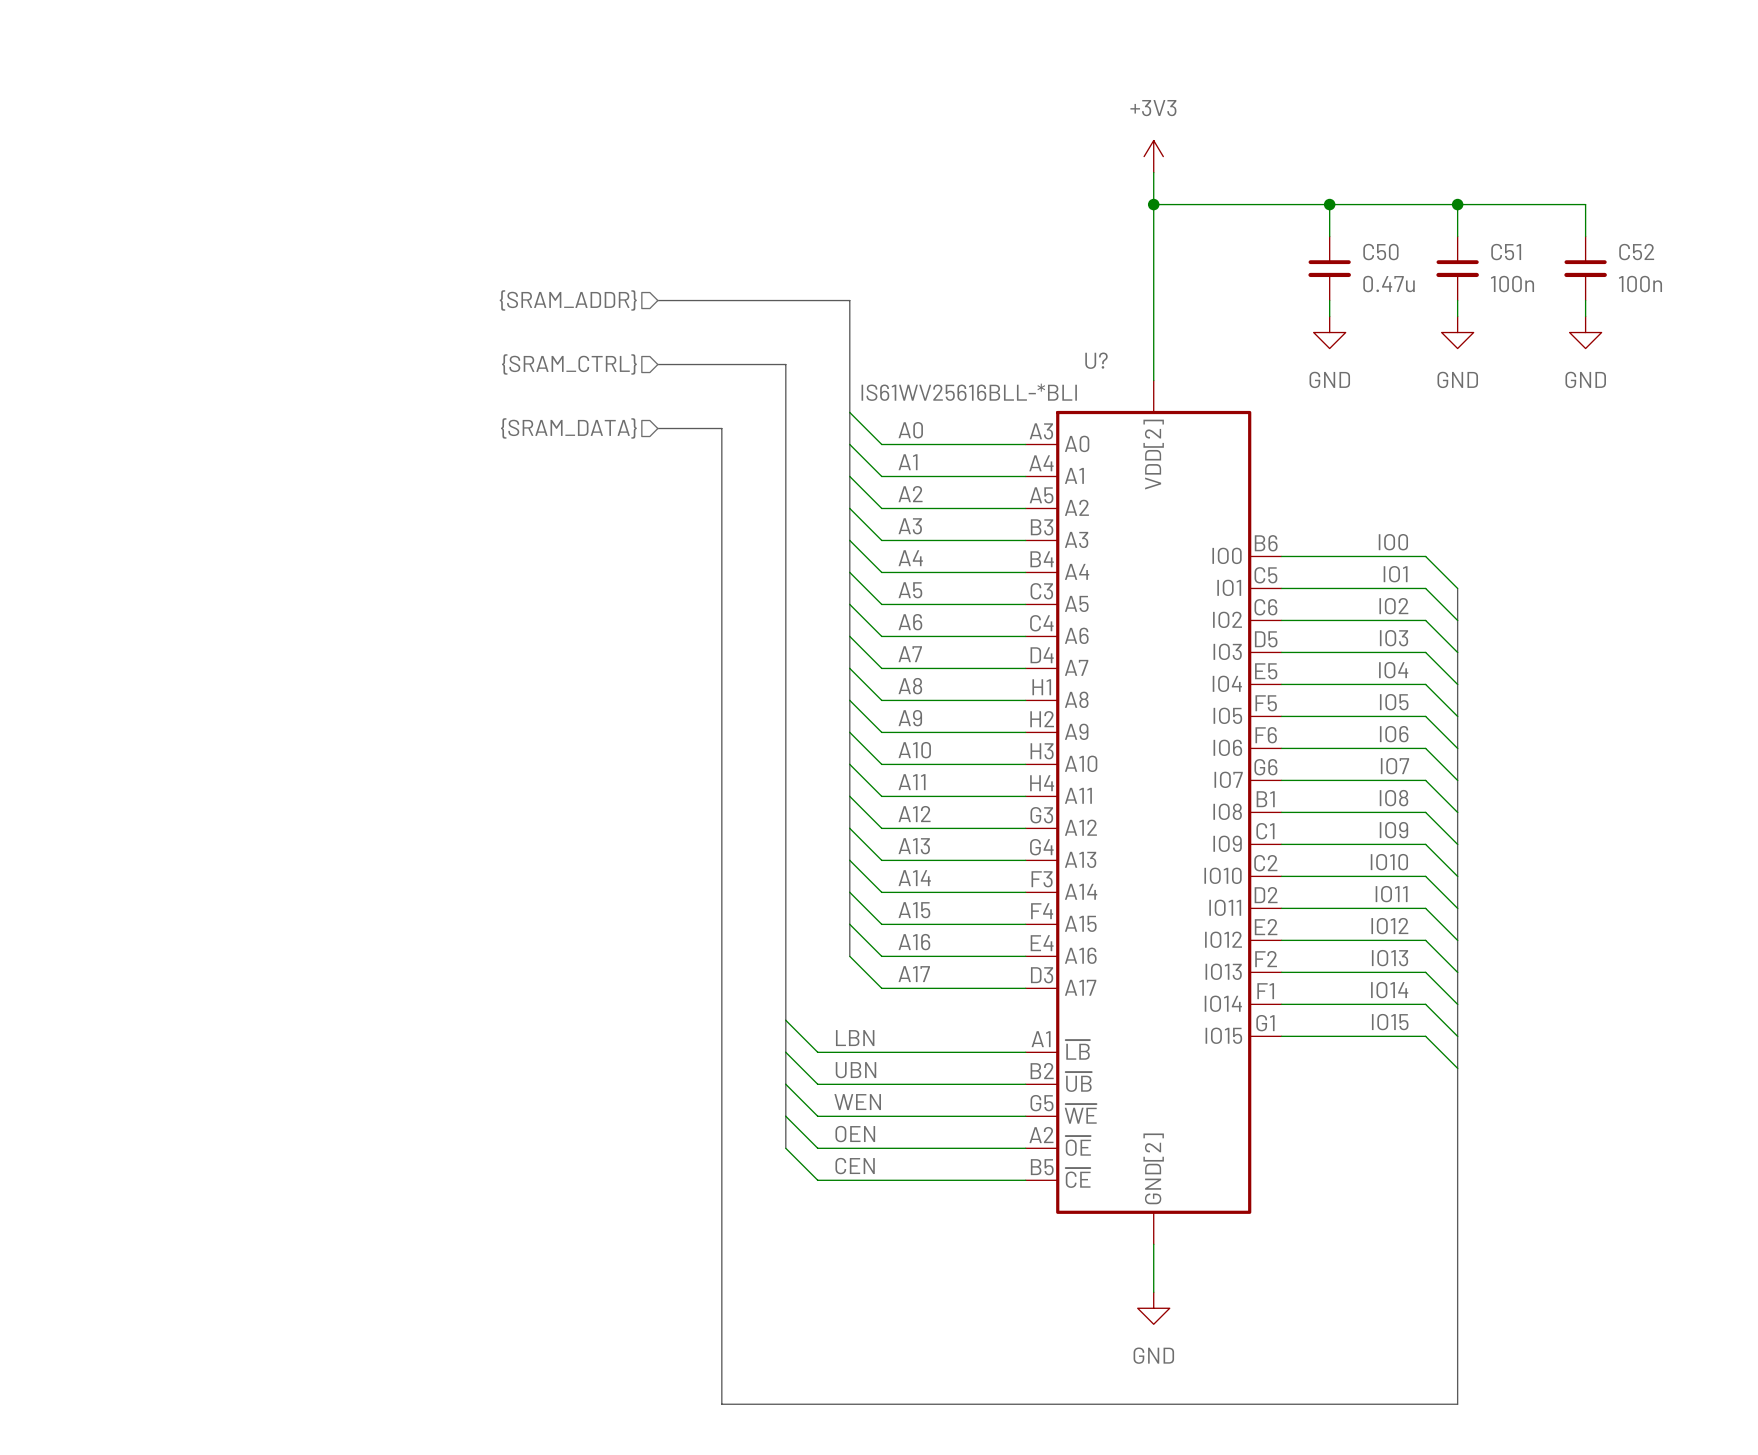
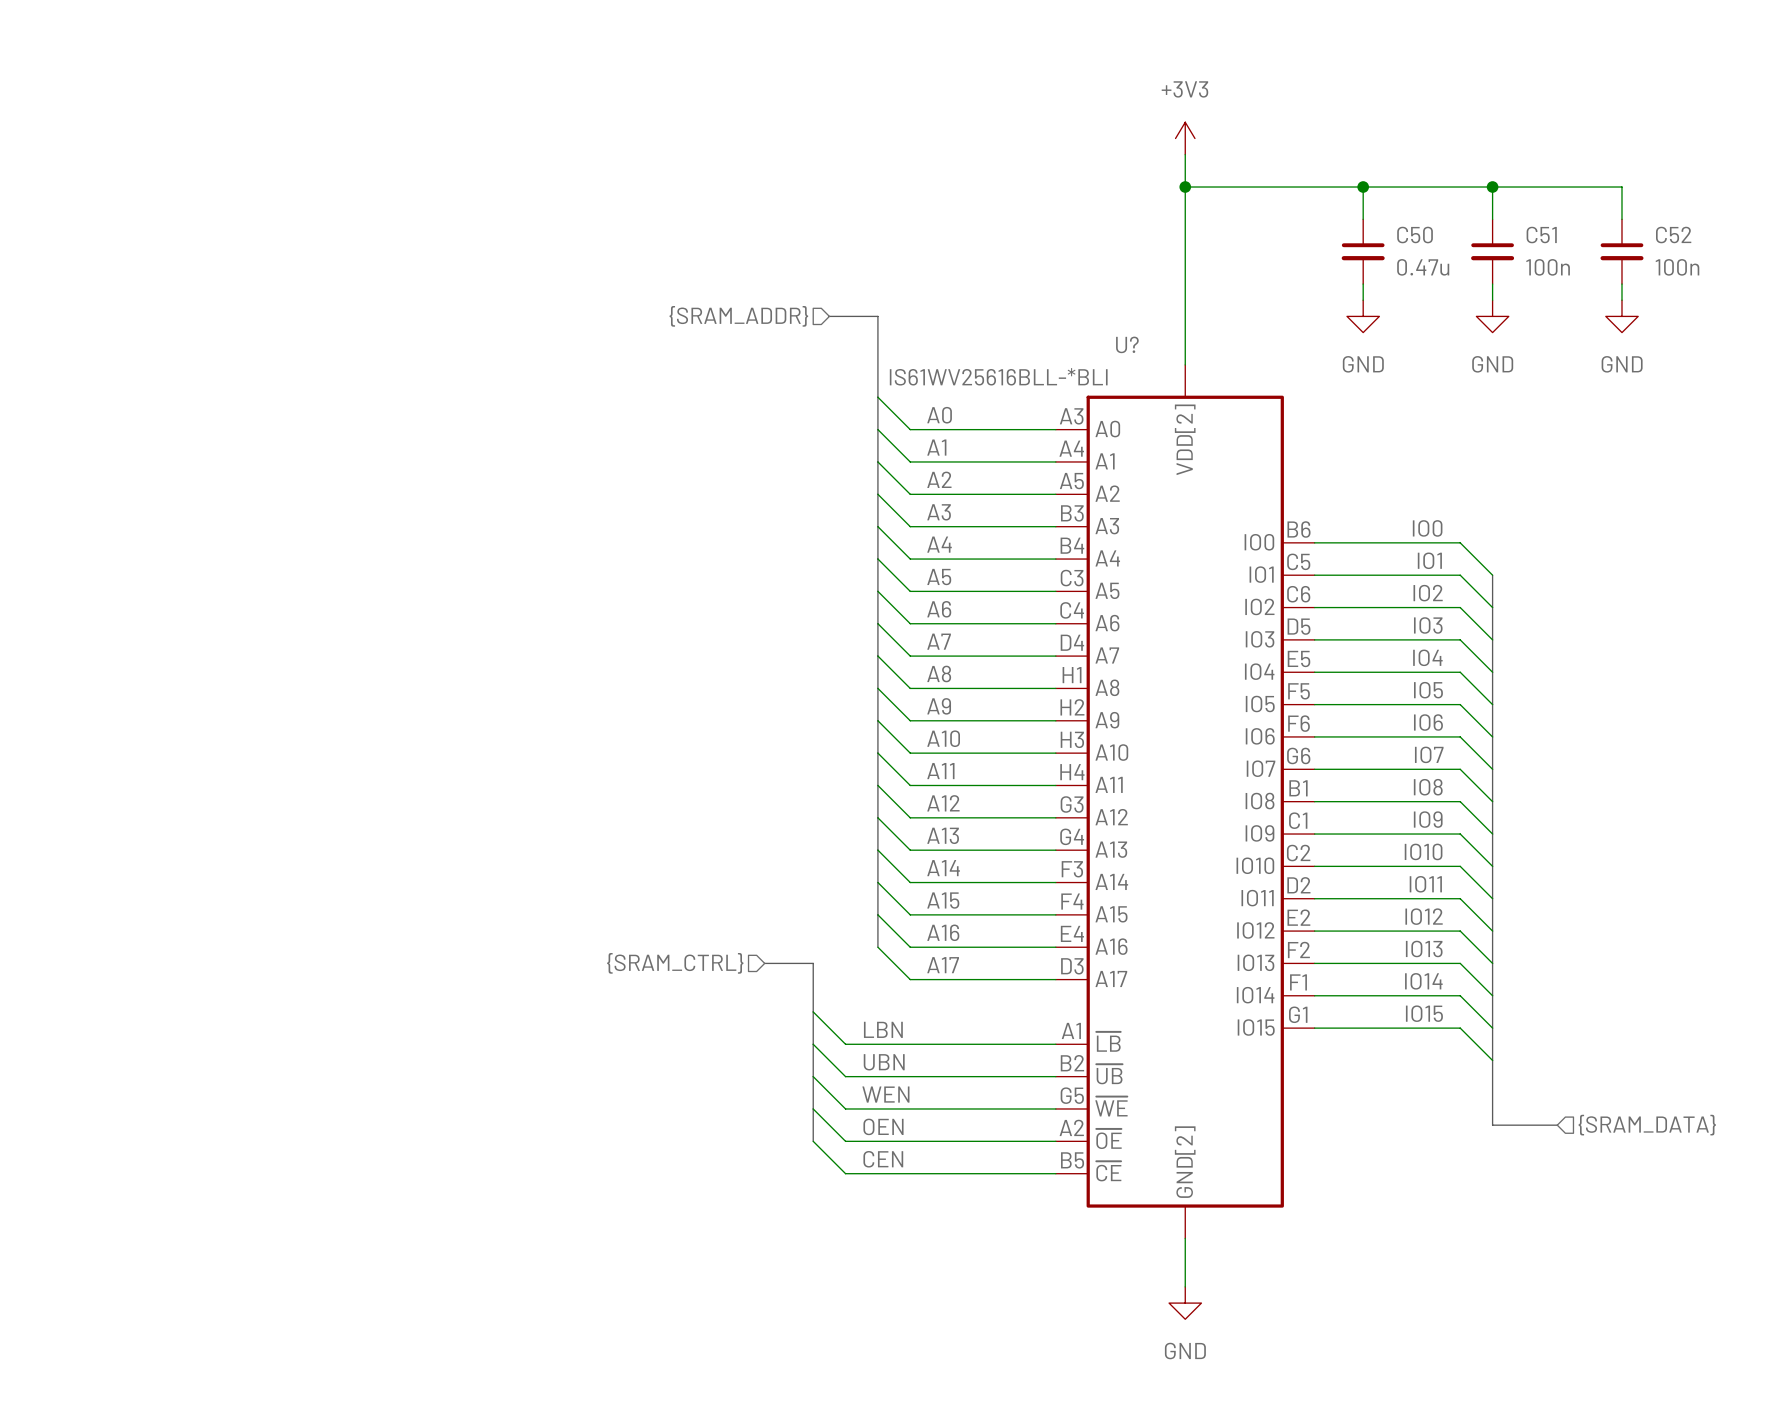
hierarchical label position: {SRAM_ADDR} (568, 300) -> {SRAM_ADDR} (738, 316)
bus: (657, 300) (849, 300) (849, 332) -> (829, 316) (877, 316)
hierarchical label: {SRAM_CTRL} (569, 364) -> none
bus: (657, 364) (785, 364) (785, 972) -> (764, 963) (813, 963)
hierarchical label: {SRAM_DATA} (568, 428) -> none
bus: (657, 428) (721, 428) (721, 1404) (1457, 1404) (1457, 1132) -> (1557, 1125) (1492, 1125)
hierarchical label: none -> {SRAM_CTRL} (675, 963)
hierarchical label: none -> {SRAM_DATA} (1647, 1125)

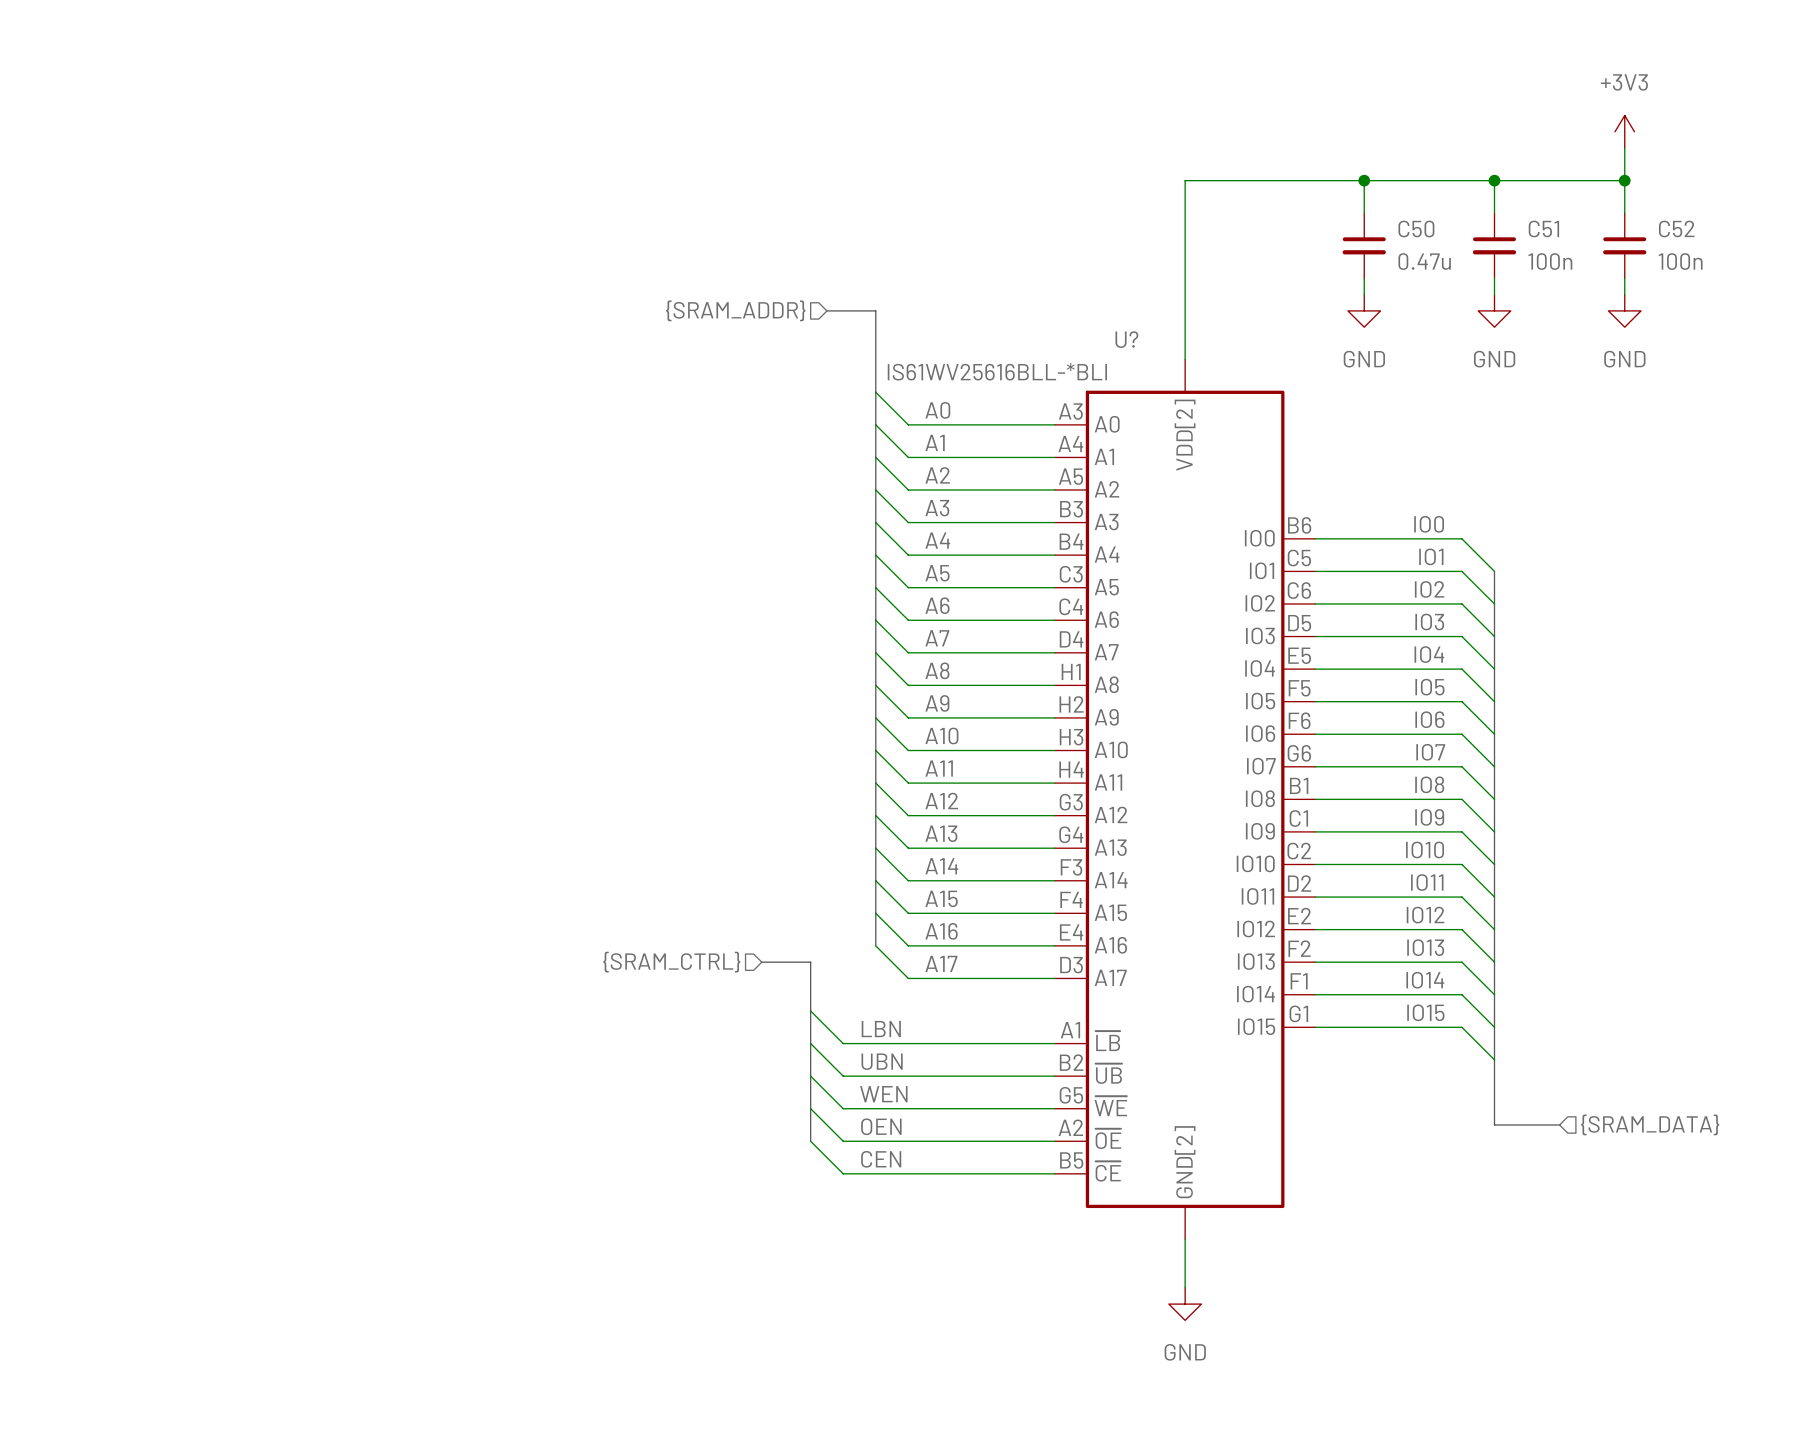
power symbol: +3V3 (1185, 138) -> none
power symbol: none -> +3V3 (1624, 131)
wire: (1185, 154) (1185, 187) -> none
wire: none -> (1624, 148) (1624, 180)
junction: (1185, 187) -> none
junction: none -> (1624, 180)

